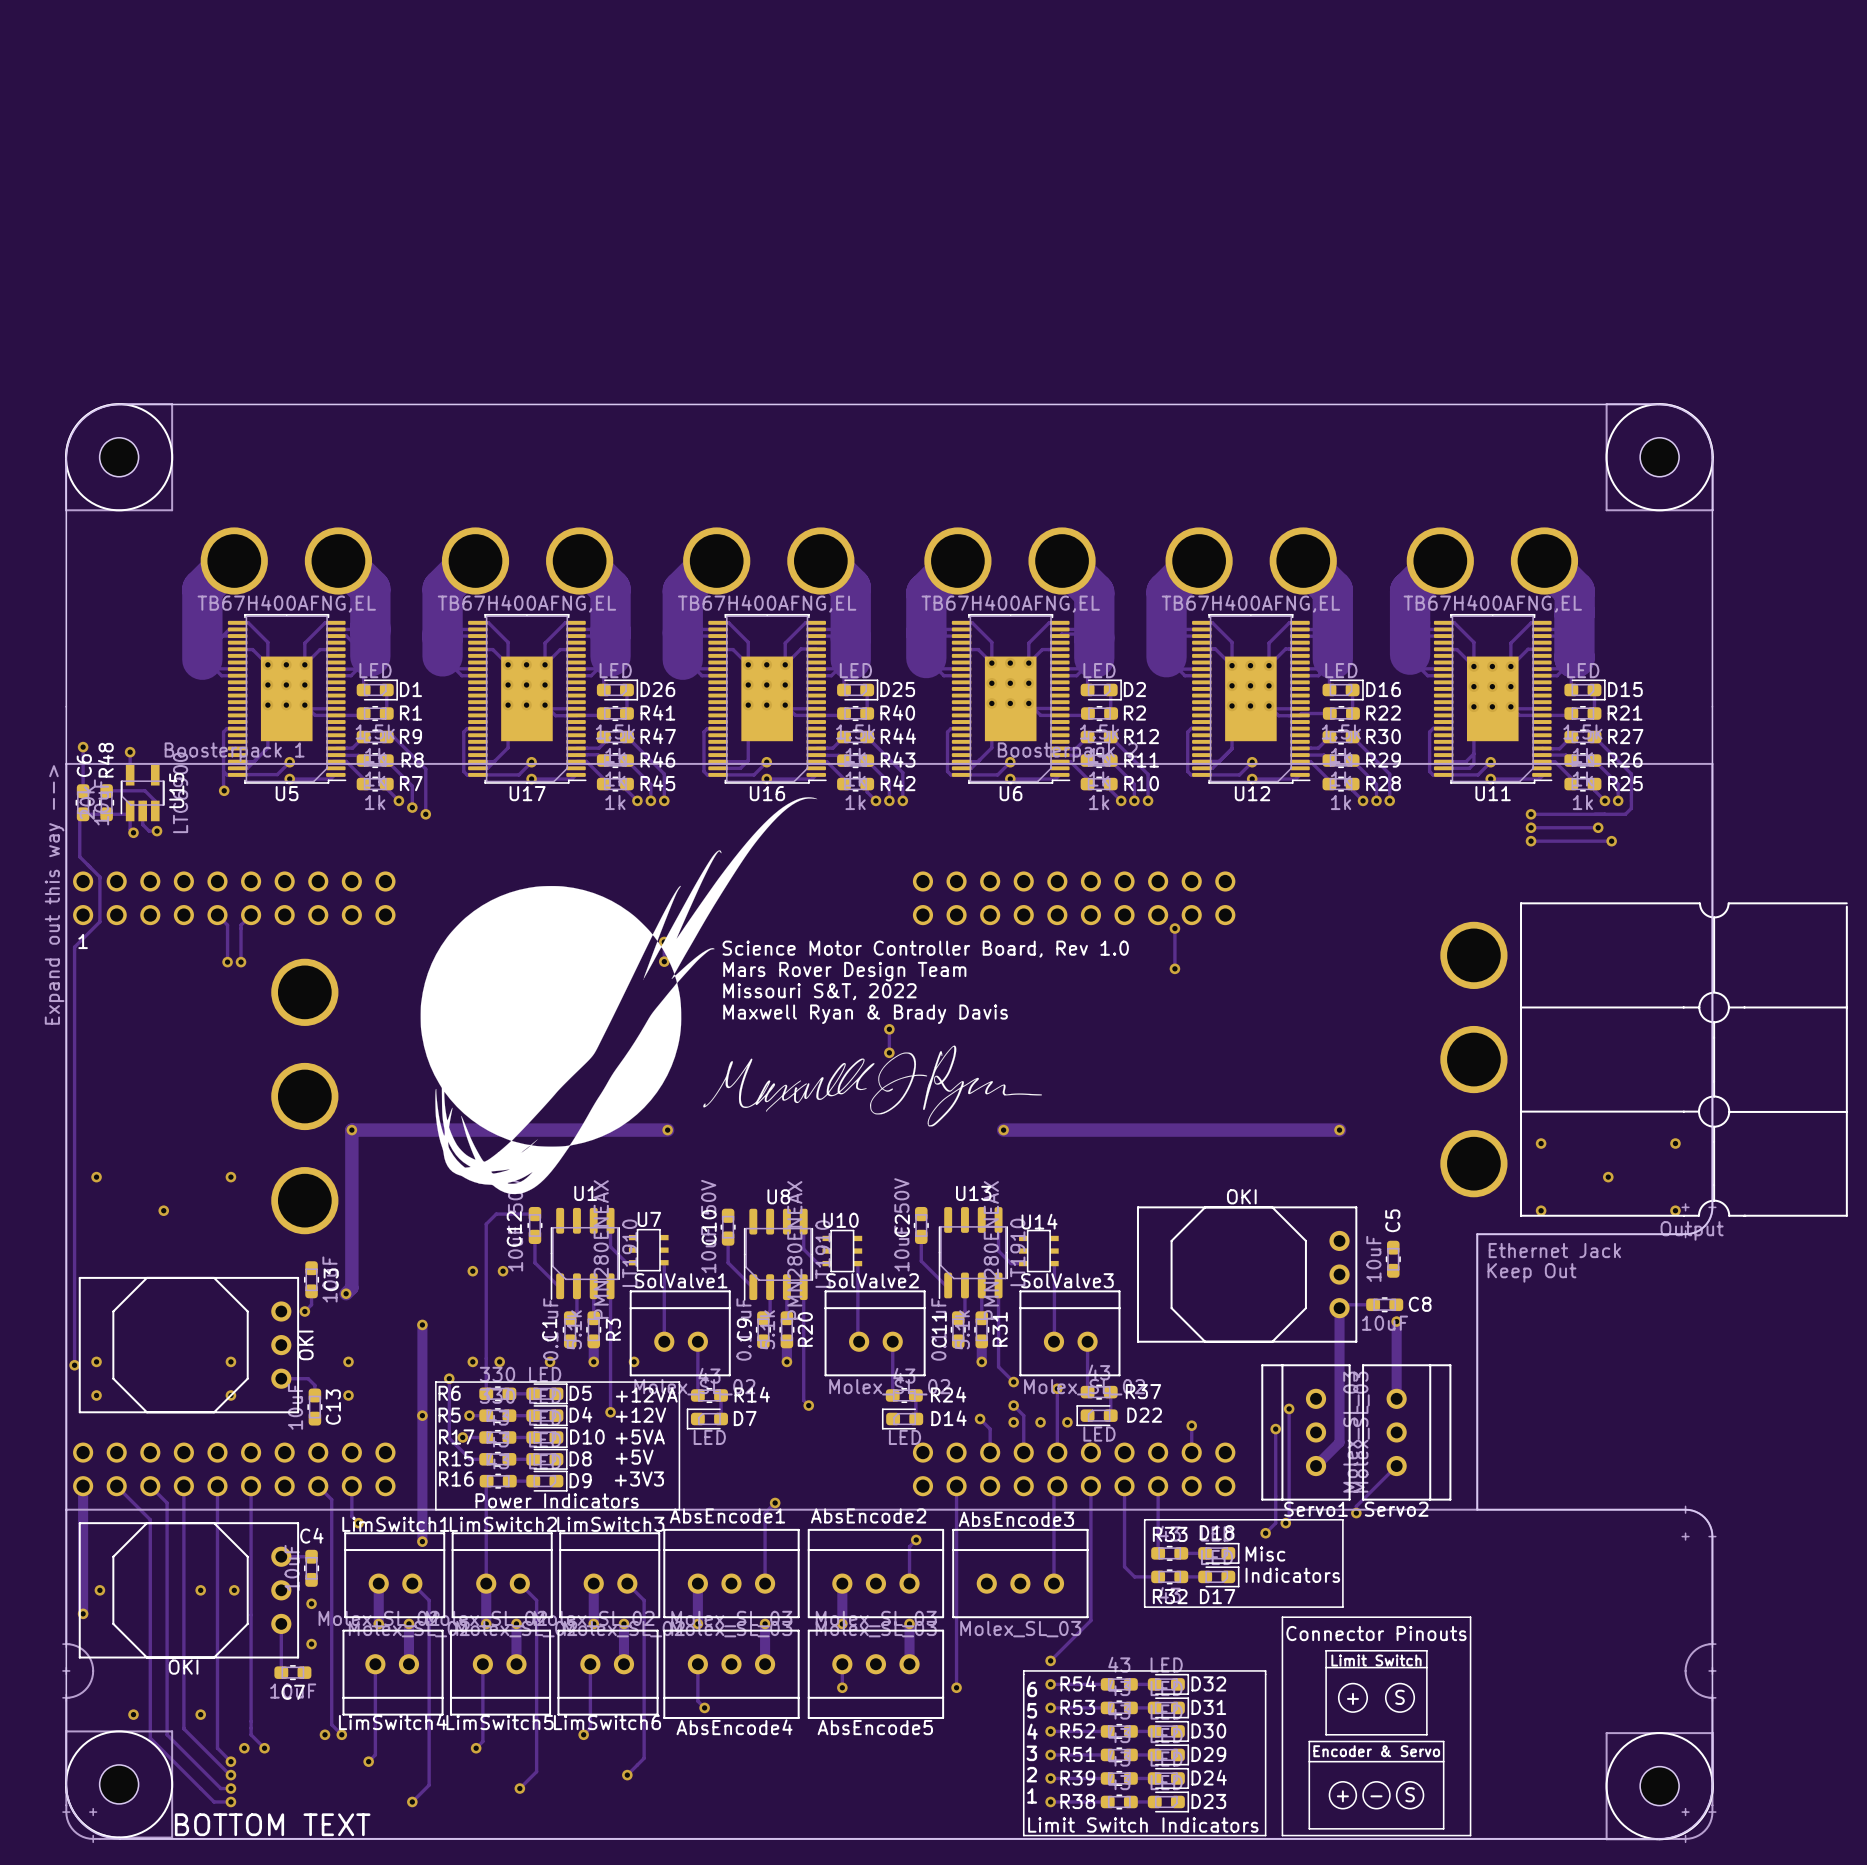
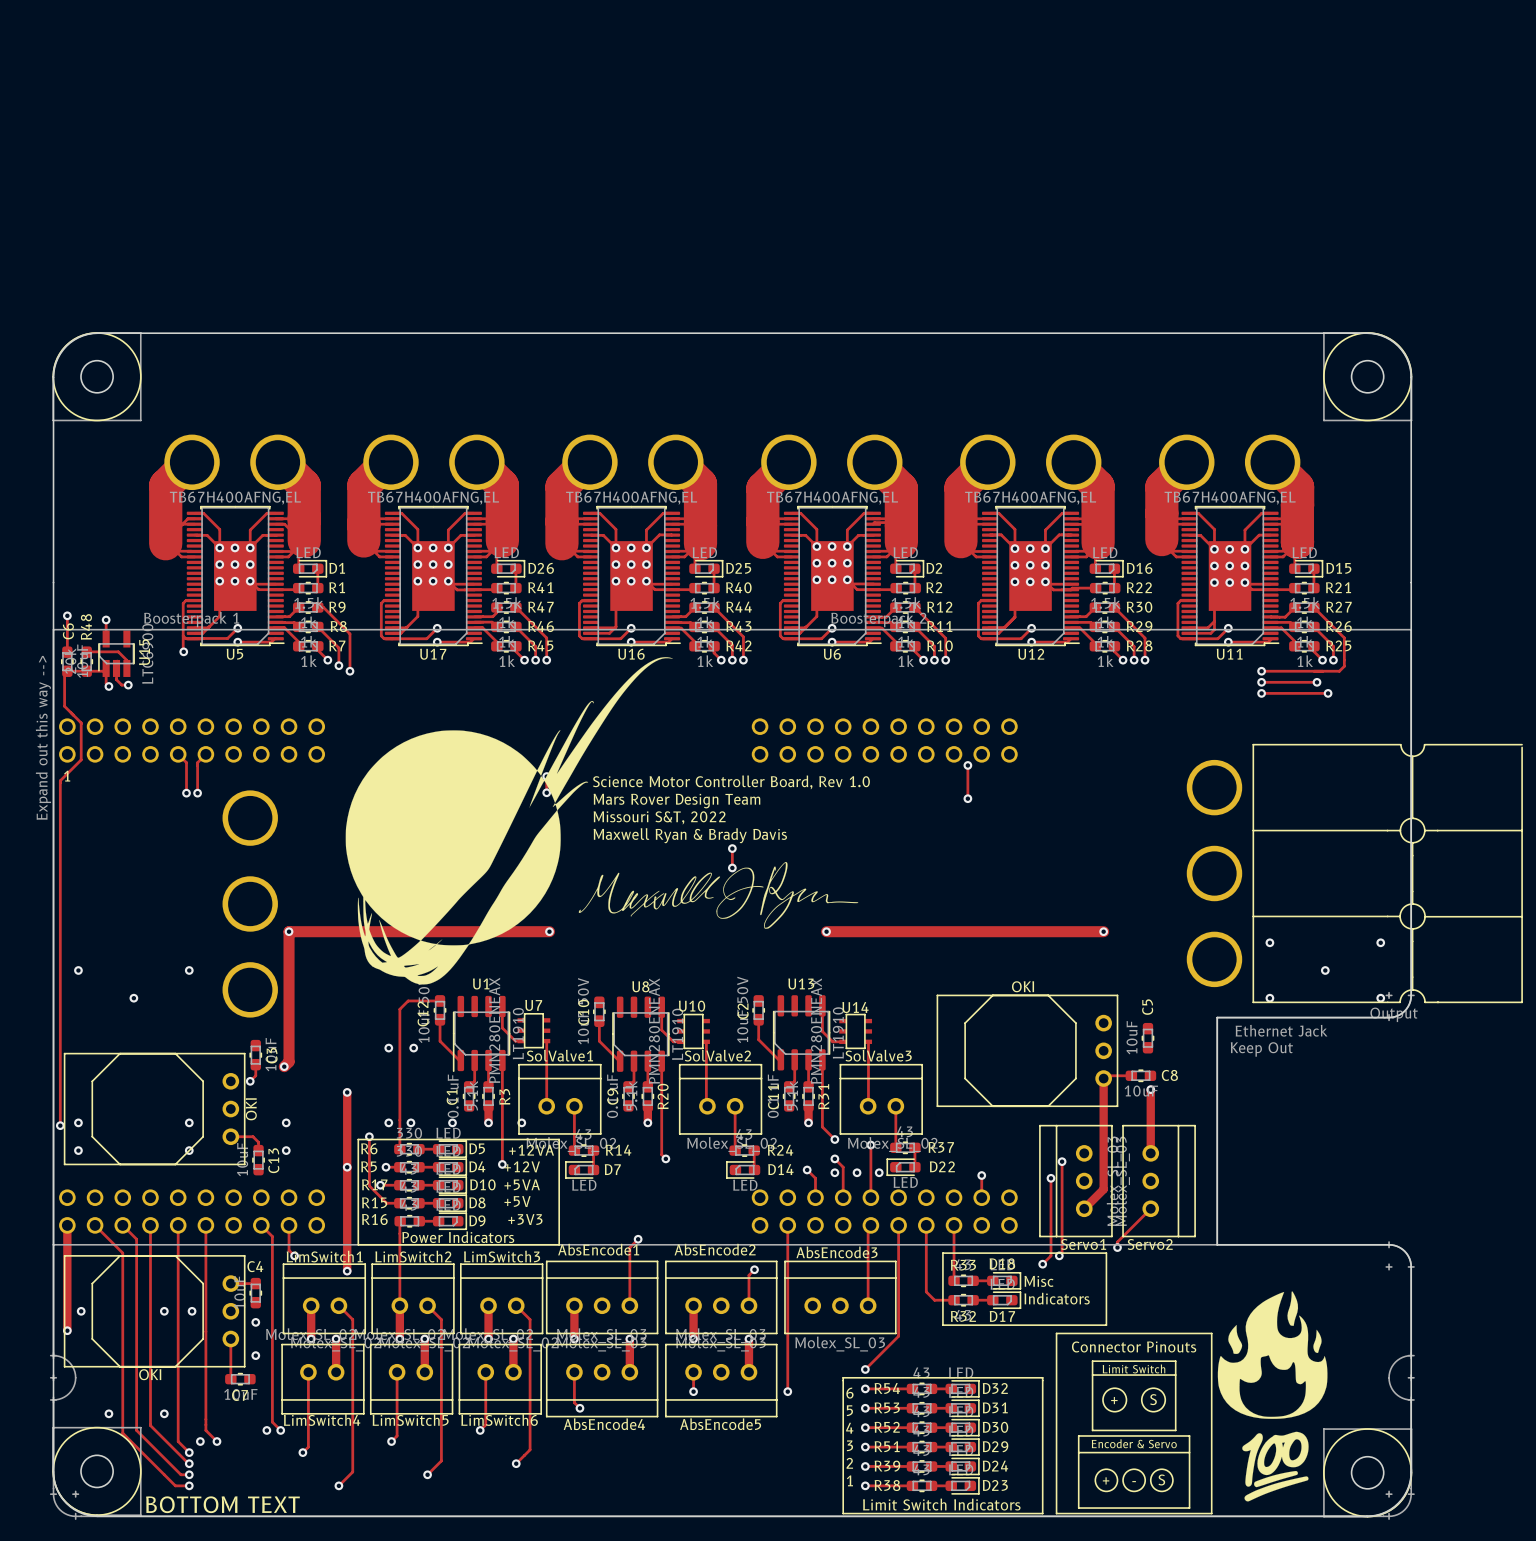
drawing: none -> [1217, 1291, 1328, 1502]

